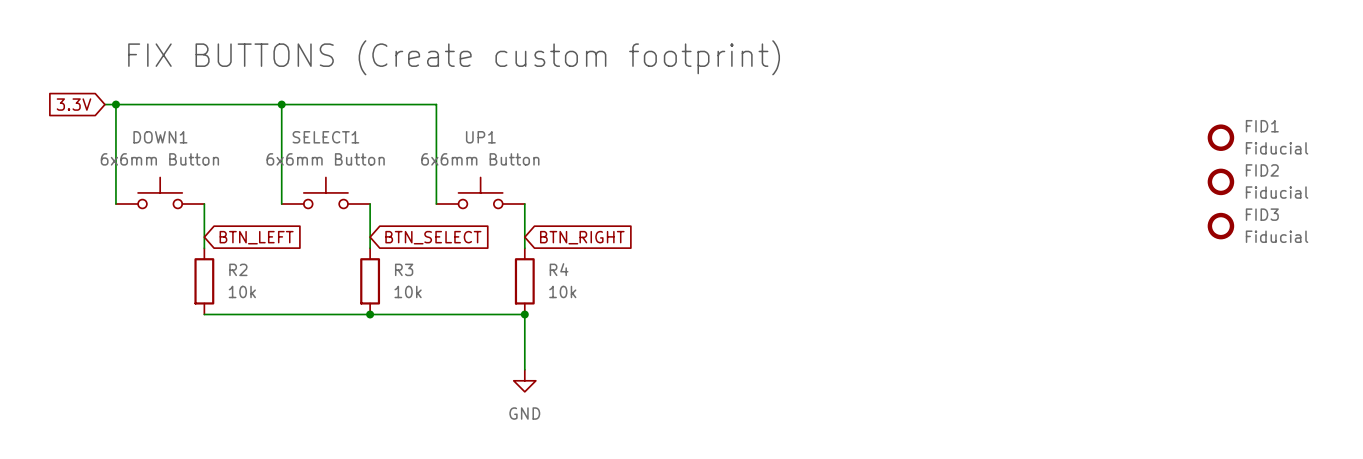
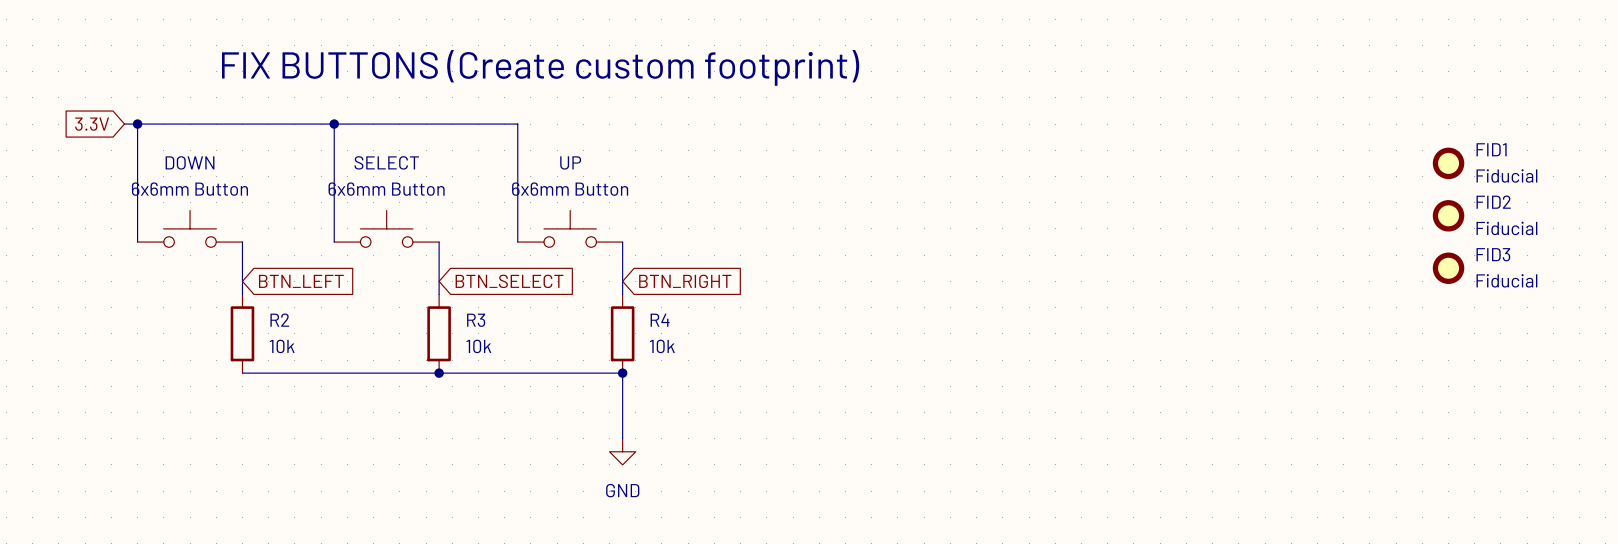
DOWN1 name: DOWN1 (160, 137) -> DOWN (190, 162)
SELECT1 name: SELECT1 (325, 137) -> SELECT (386, 162)
UP1 name: UP1 (480, 137) -> UP (570, 162)

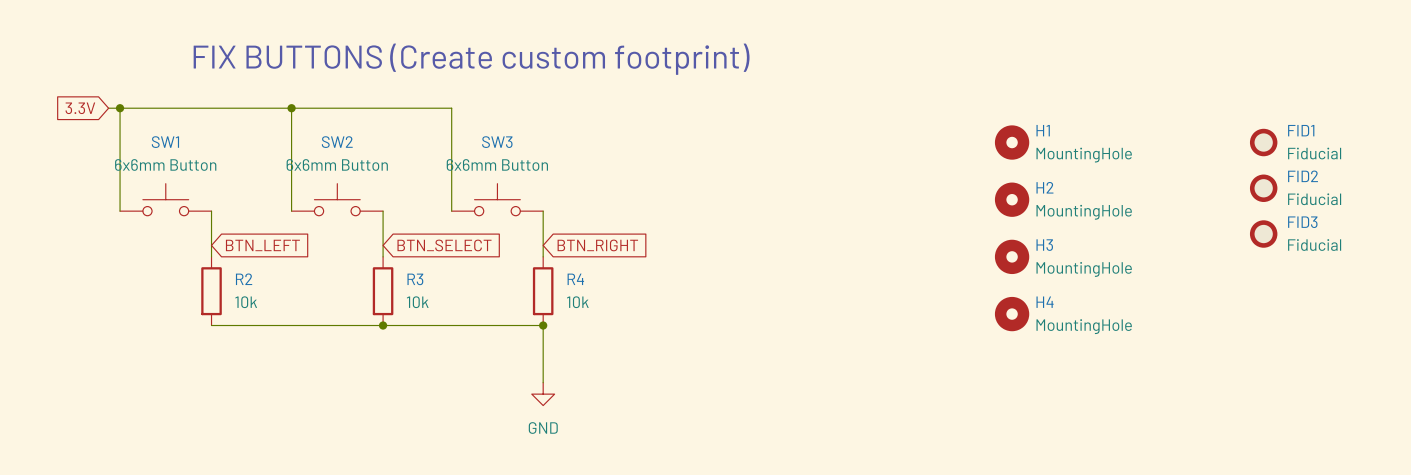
DOWN name: DOWN (190, 162) -> SW1 (165, 142)
SELECT name: SELECT (386, 162) -> SW2 (337, 142)
UP name: UP (570, 162) -> SW3 (497, 142)
H1: none -> MountingHole (1012, 142)
H2: none -> MountingHole (1012, 199)
H3: none -> MountingHole (1012, 256)
H4: none -> MountingHole (1012, 314)

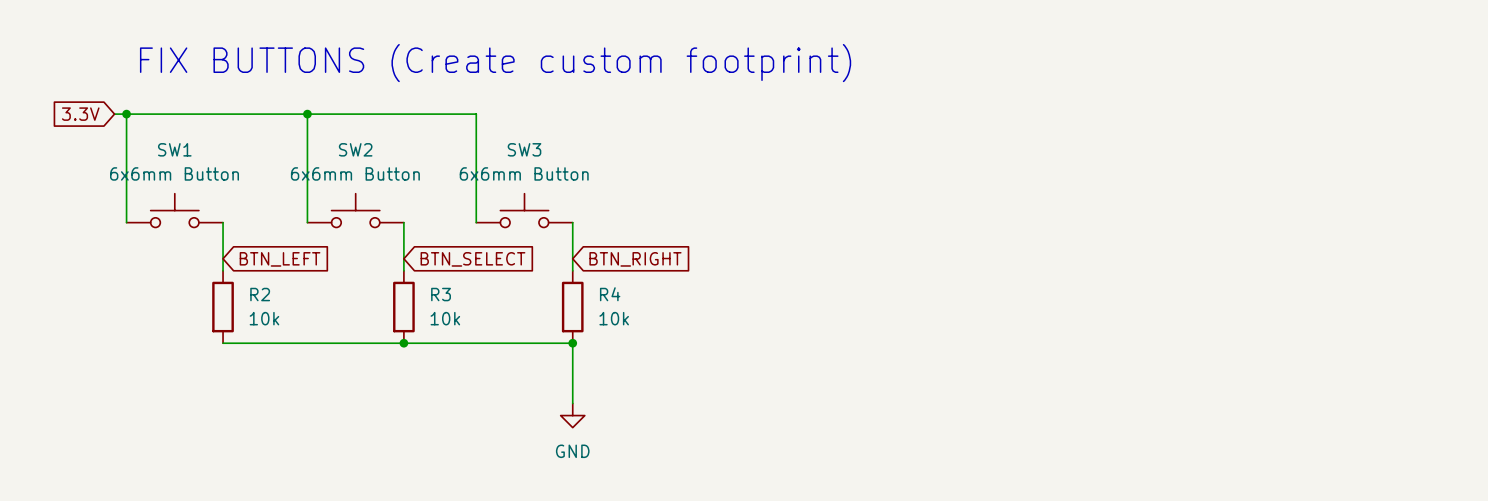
H1: MountingHole (1012, 142) -> none
FID1: Fiducial (1263, 142) -> none
FID2: Fiducial (1263, 188) -> none
H2: MountingHole (1012, 199) -> none
FID3: Fiducial (1263, 234) -> none
H3: MountingHole (1012, 256) -> none
H4: MountingHole (1012, 314) -> none

